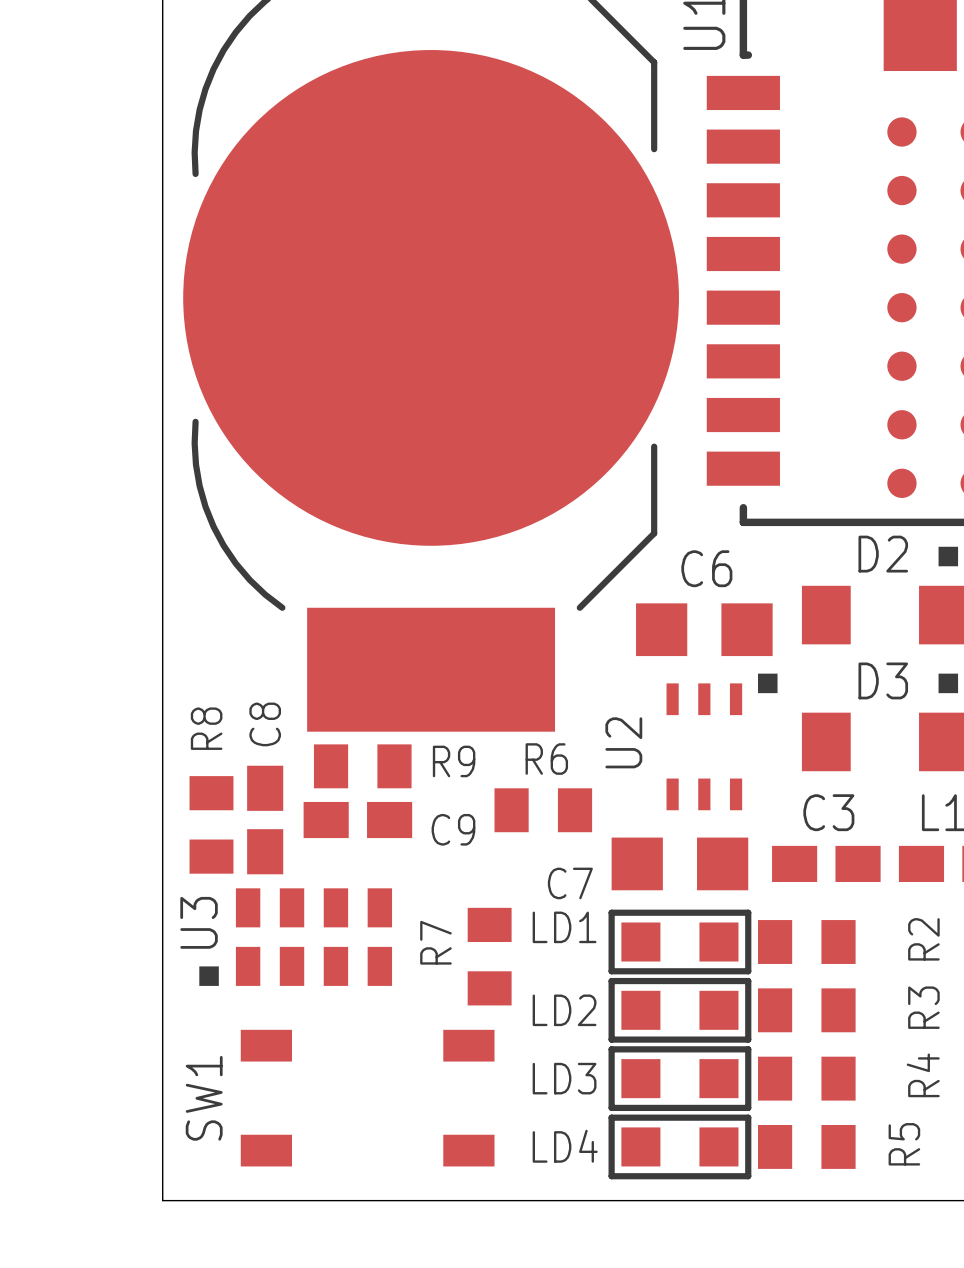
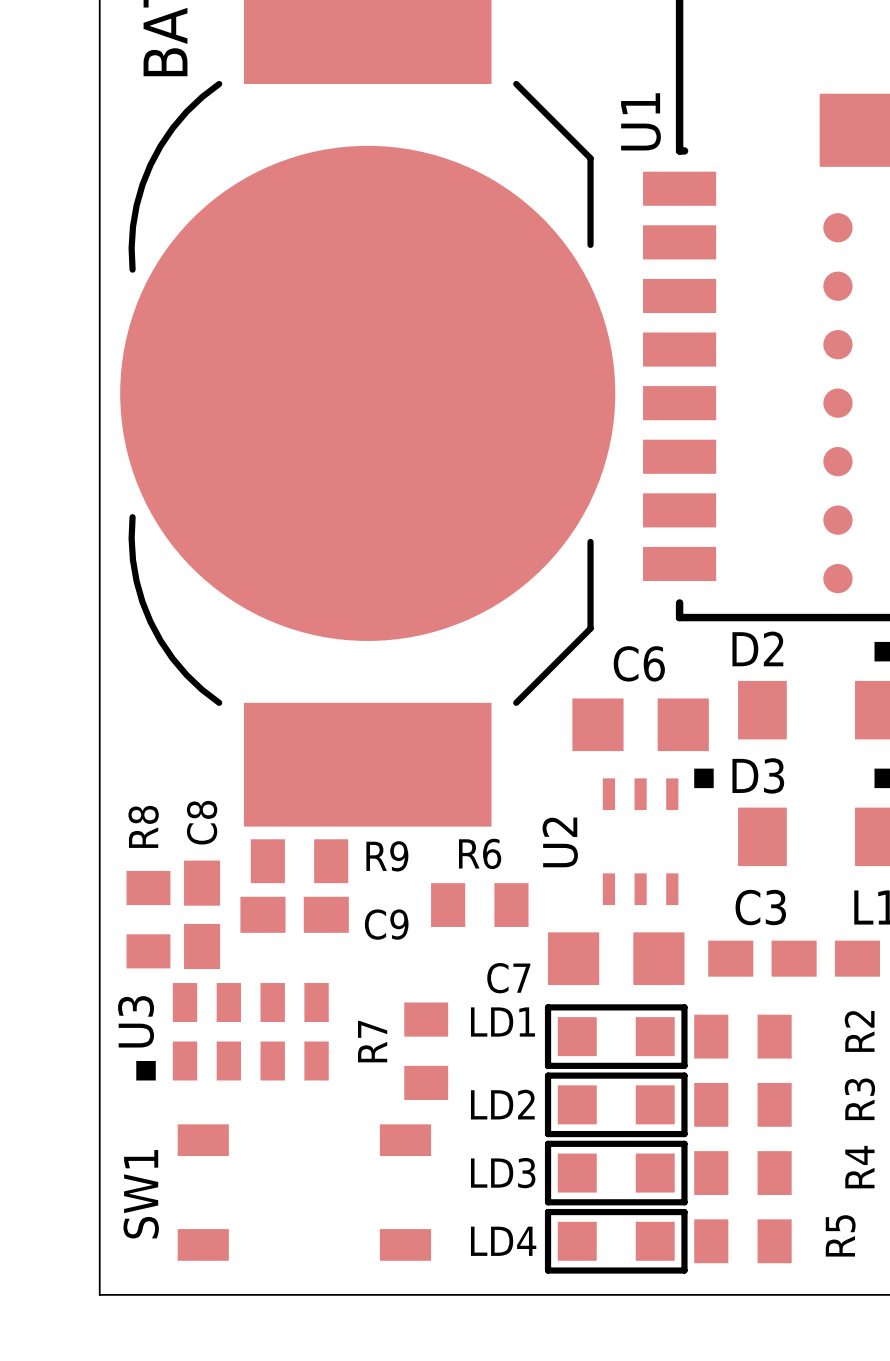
D2 name position: D2 (883, 554) -> D2 (757, 648)
D3 name position: D3 (883, 680) -> D3 (758, 775)

